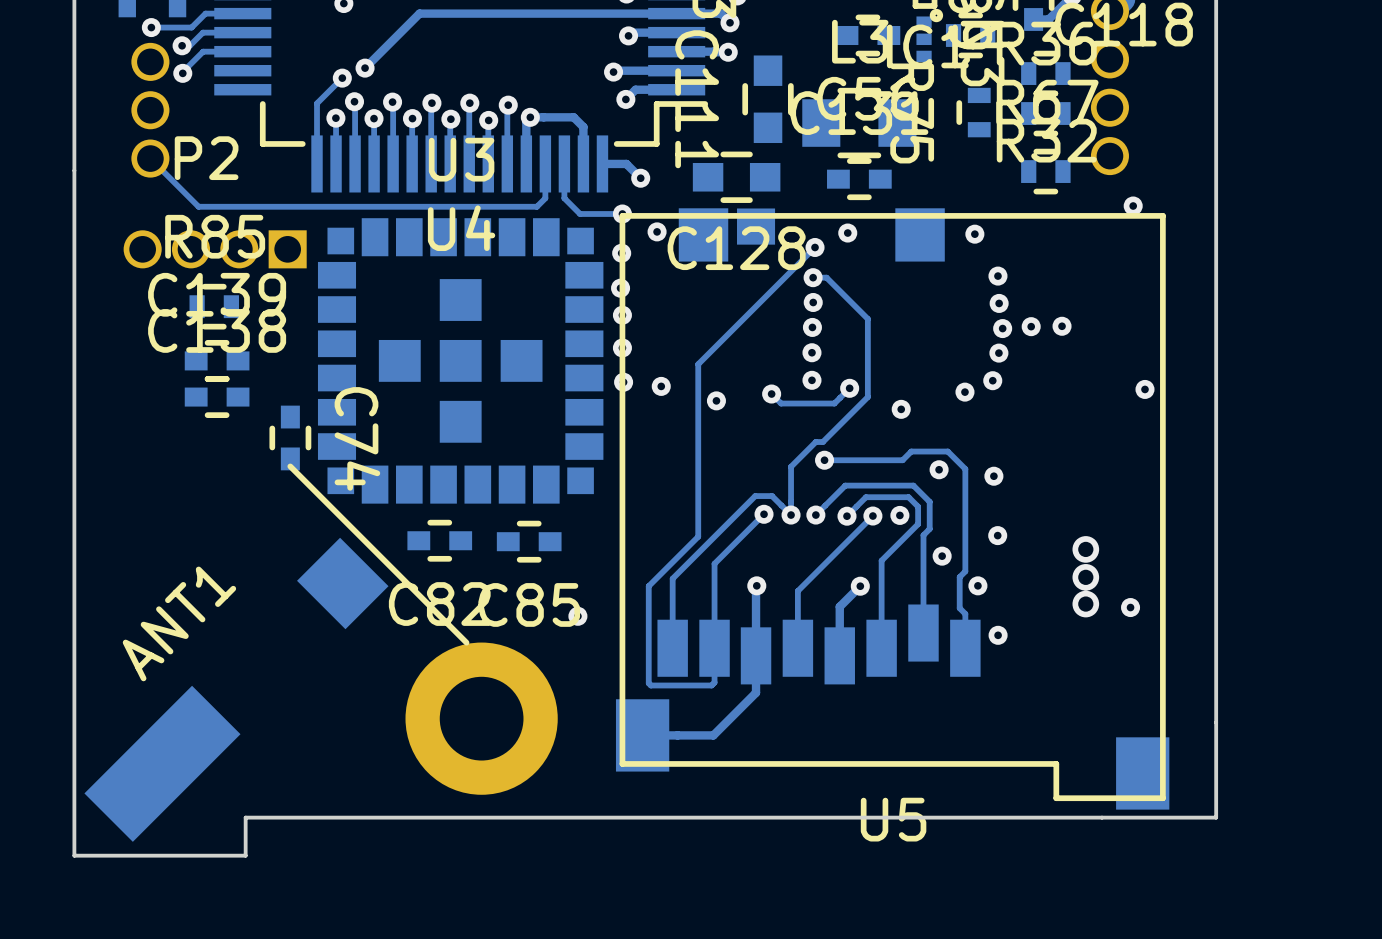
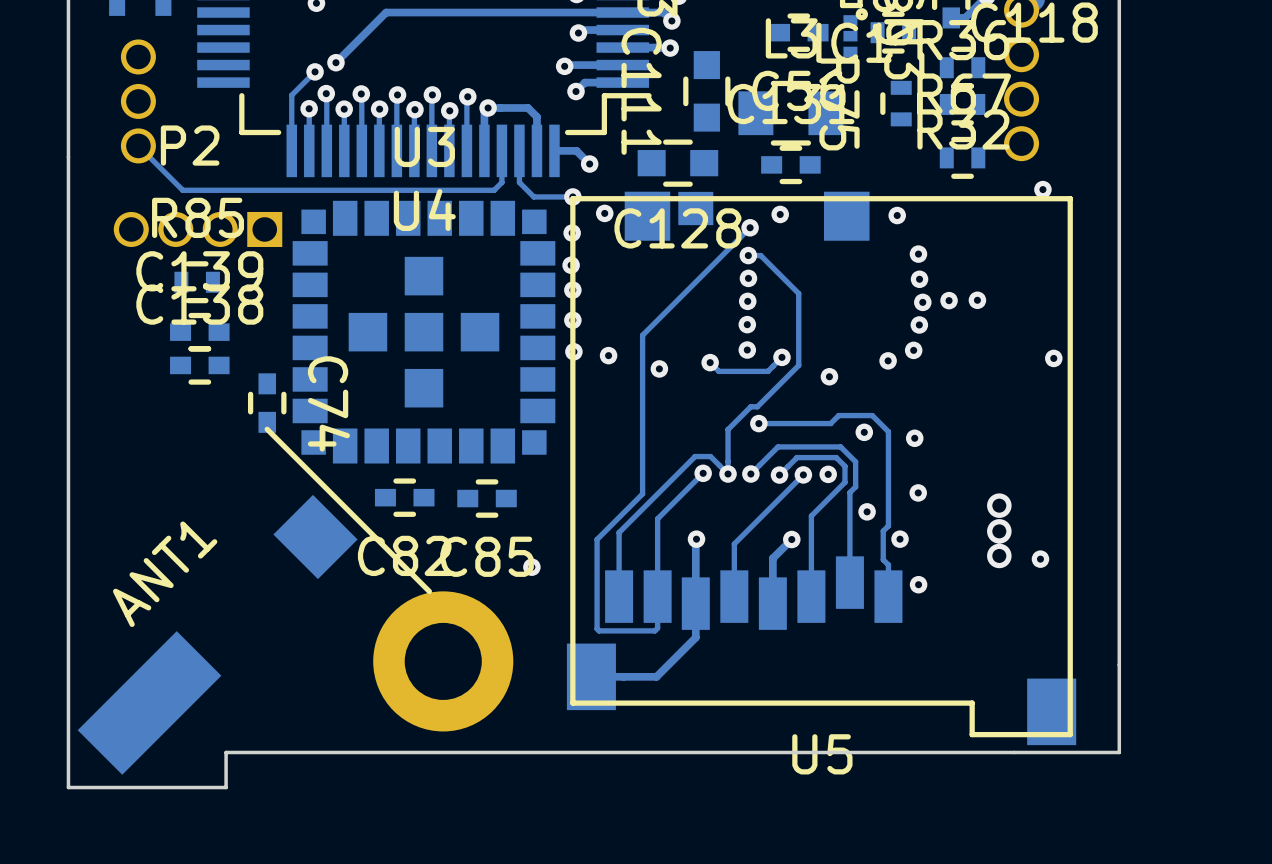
track: (242, 13) (205, 13) (191, 27) (151, 27) -> none
via: (151, 27) -> none
track: (242, 32) (202, 32) (189, 45) (182, 45) -> none
via: (182, 45) -> none
track: (242, 51) (203, 51) (182, 73) -> none
via: (182, 73) -> none

